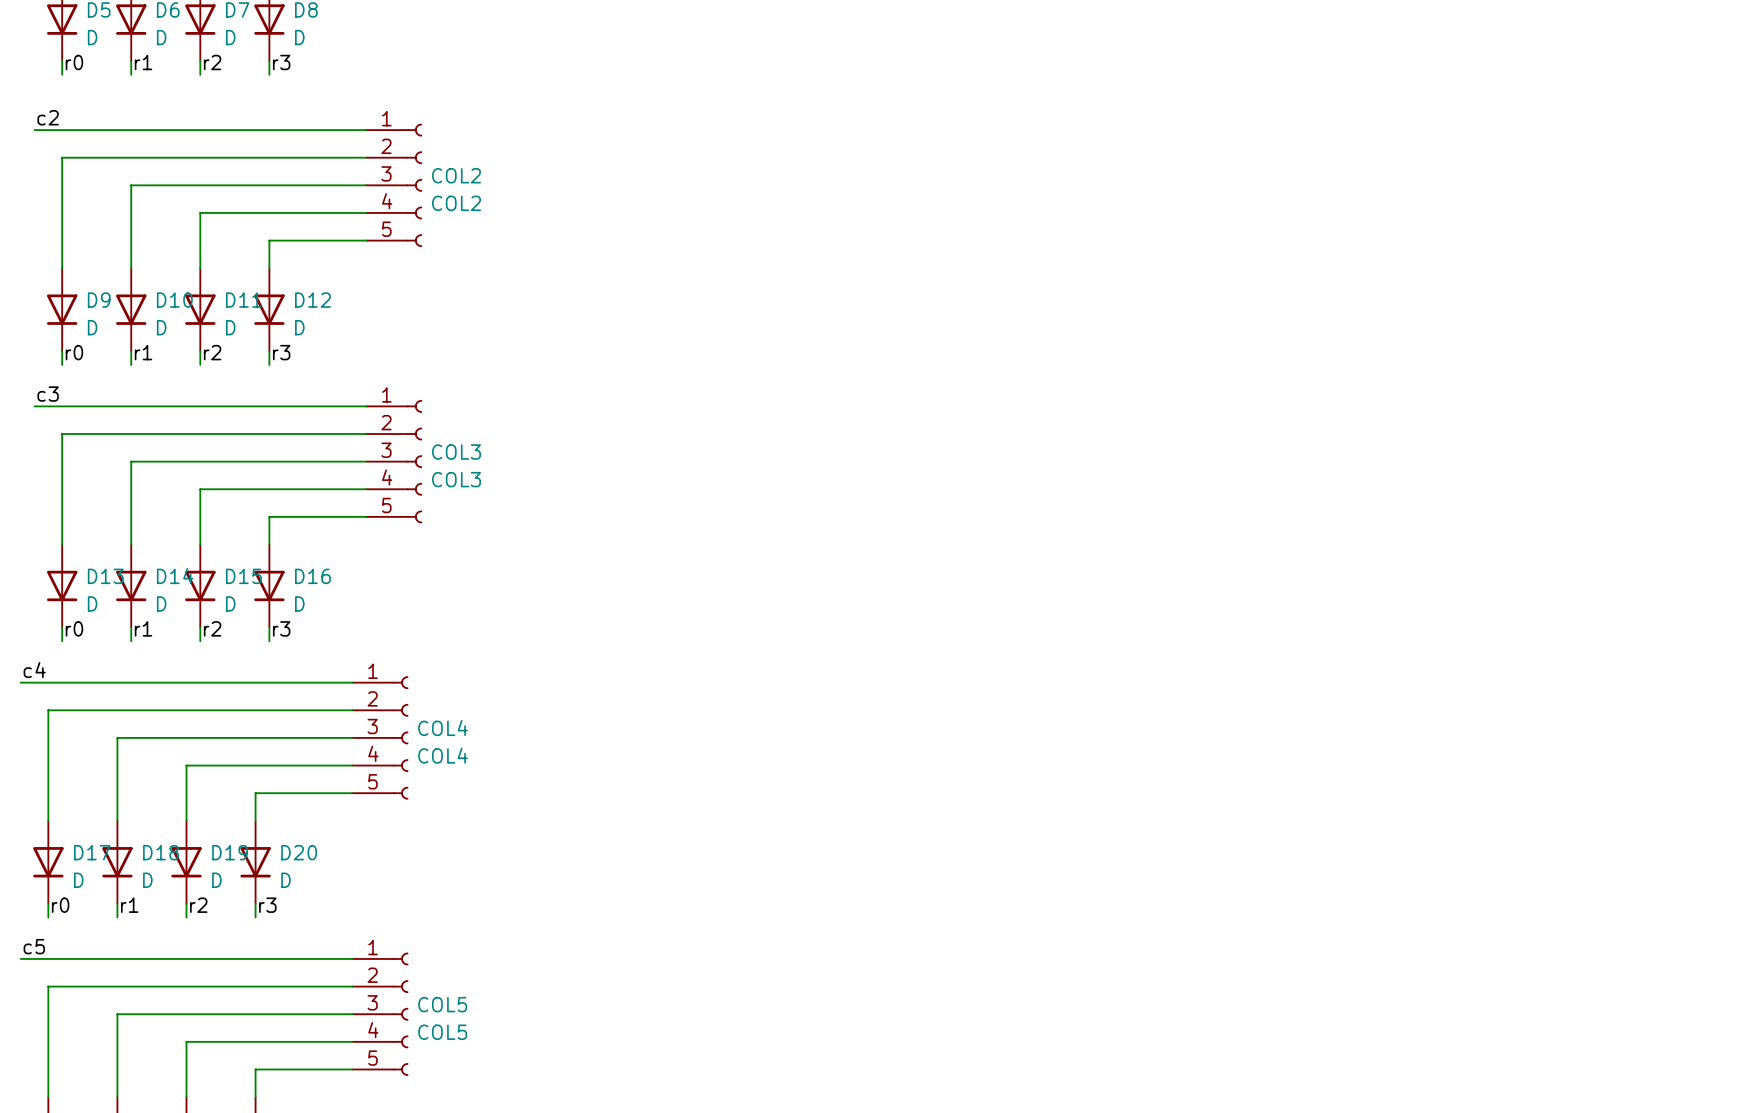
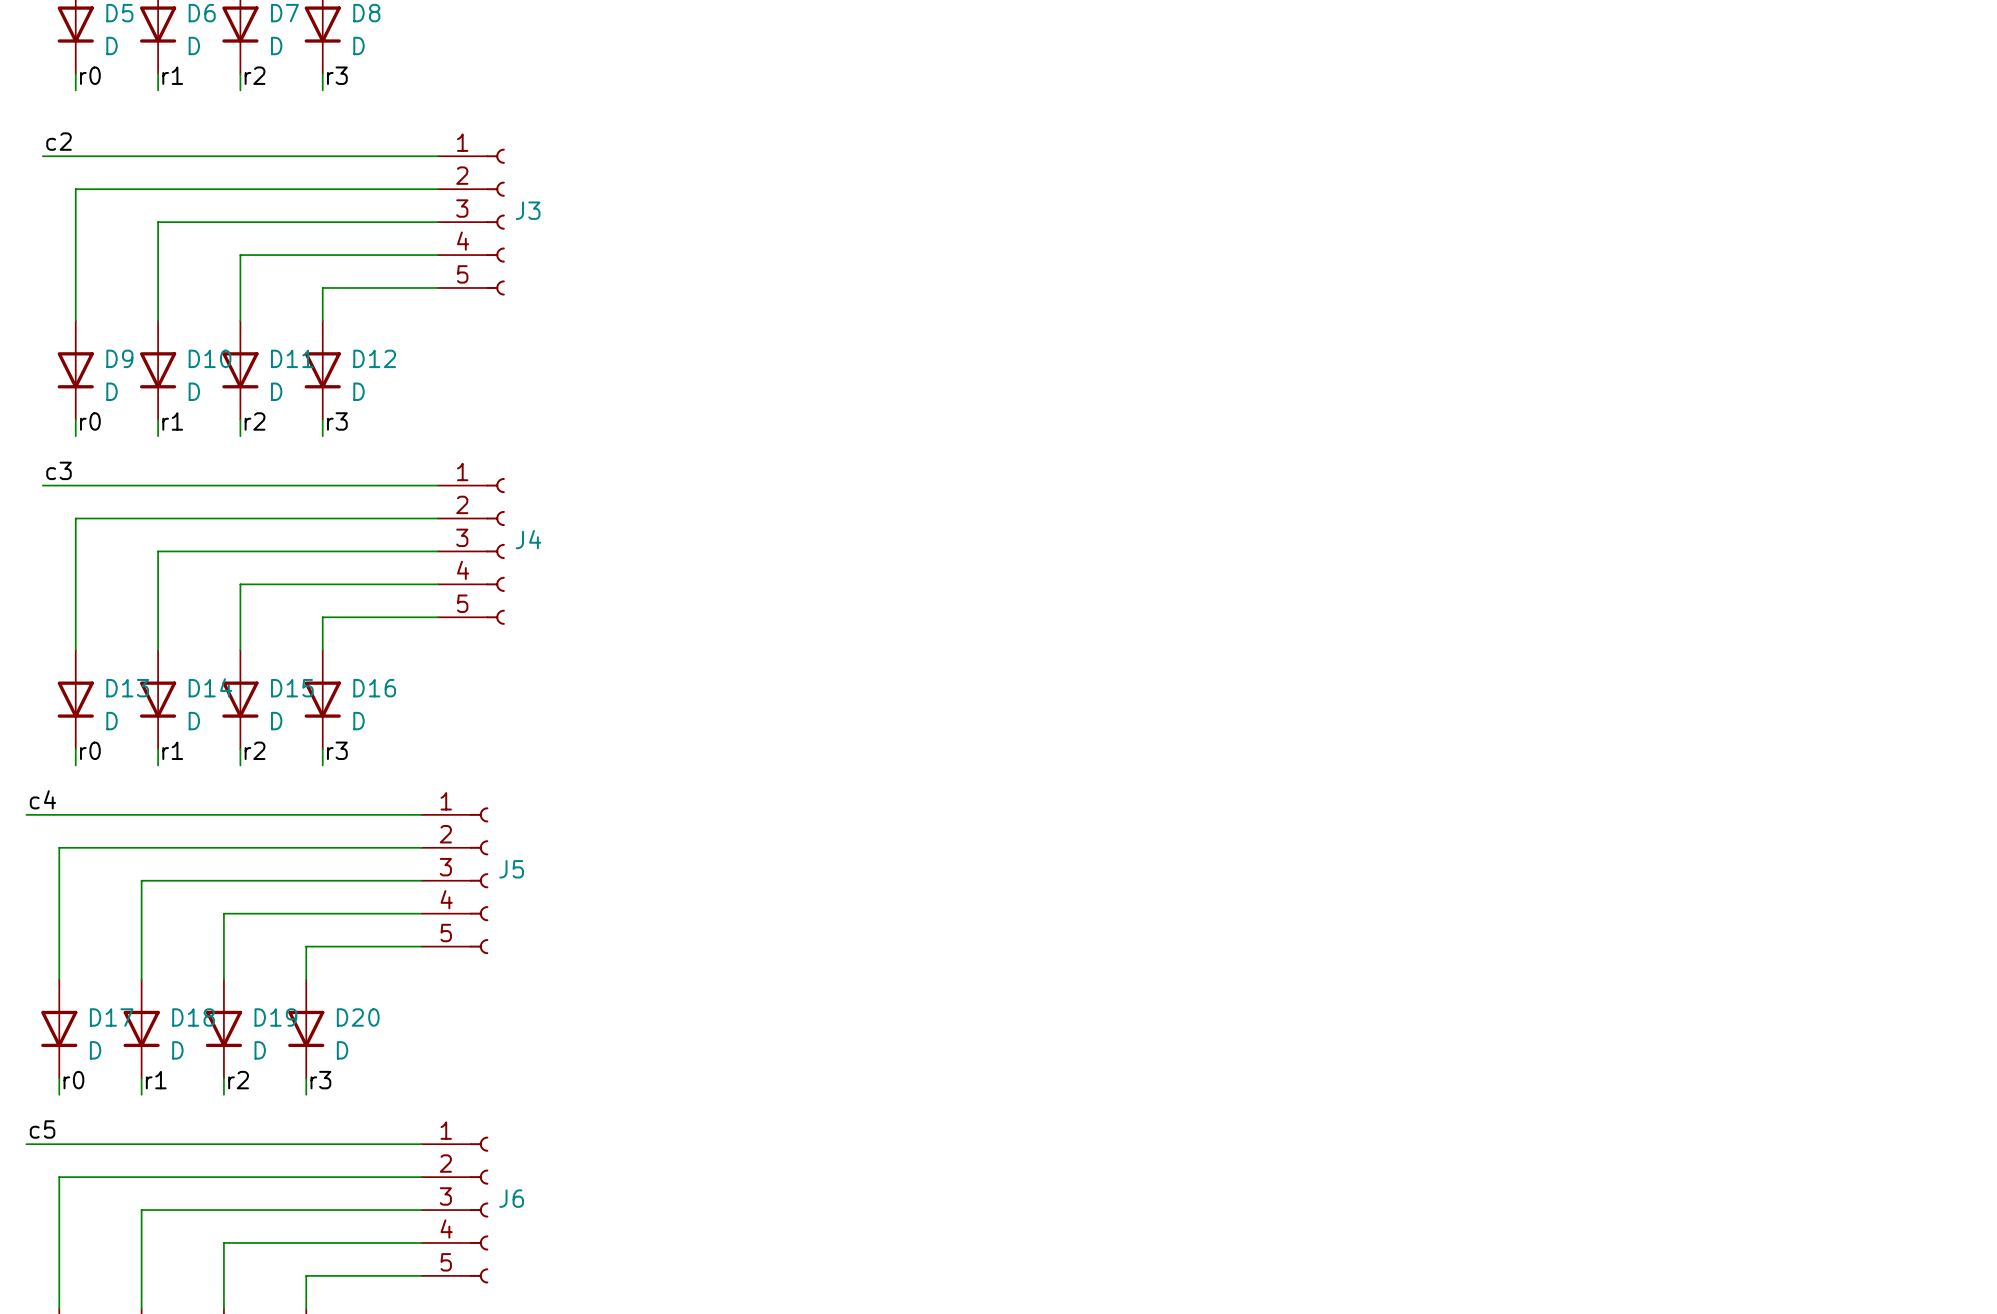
COL2 name: COL2 (456, 175) -> J3 (528, 210)
COL2 value: COL2 (456, 203) -> none
COL3 name: COL3 (456, 452) -> J4 (528, 539)
COL3 value: COL3 (456, 479) -> none
COL4 name: COL4 (443, 728) -> J5 (511, 869)
COL4 value: COL4 (443, 755) -> none
COL5 name: COL5 (442, 1004) -> J6 (511, 1198)
COL5 value: COL5 (442, 1032) -> none

